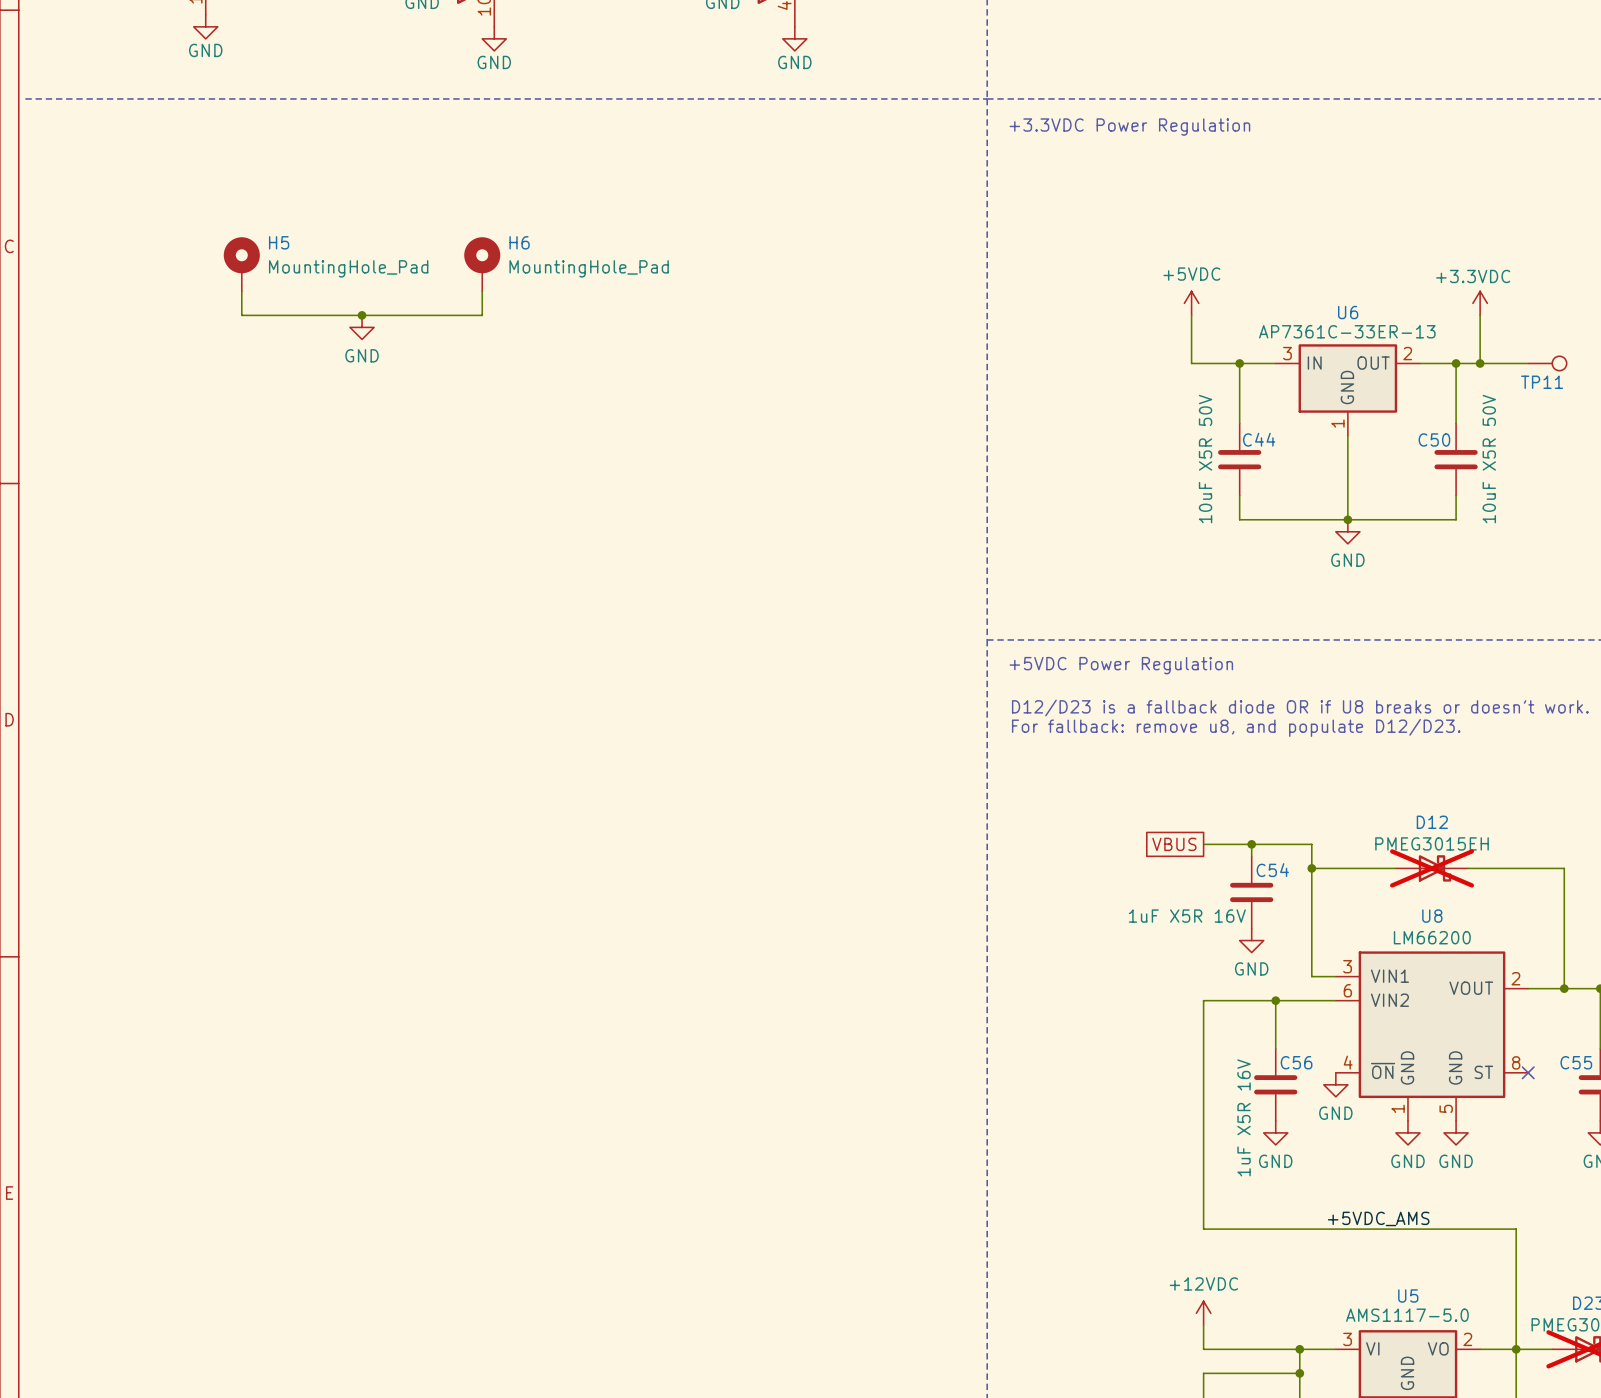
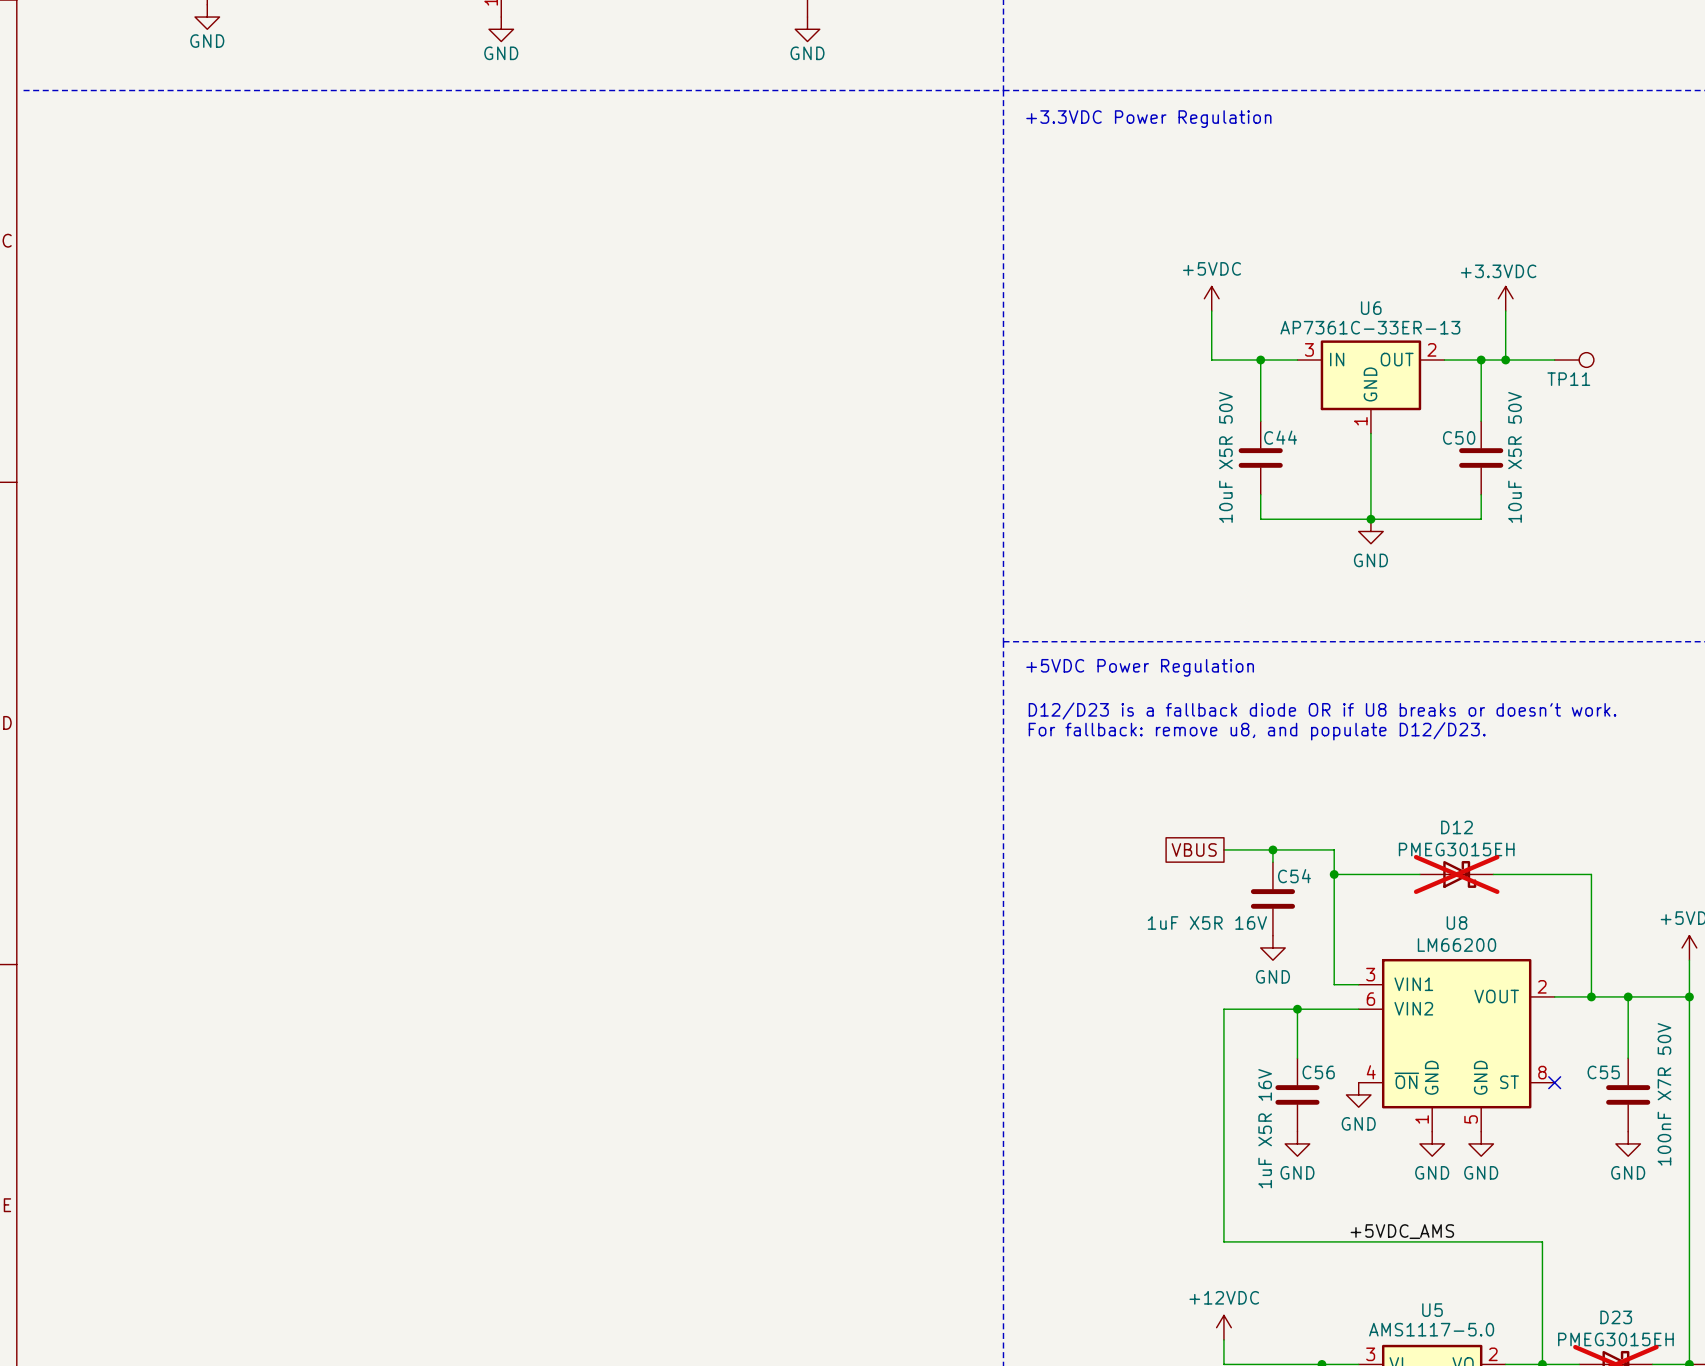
H5: MountingHole_Pad (241, 264) -> none
H6: MountingHole_Pad (482, 264) -> none
wire: (241, 291) (241, 315) (482, 315) (482, 291) -> none
junction: (362, 315) -> none
power symbol: GND (362, 327) -> none

